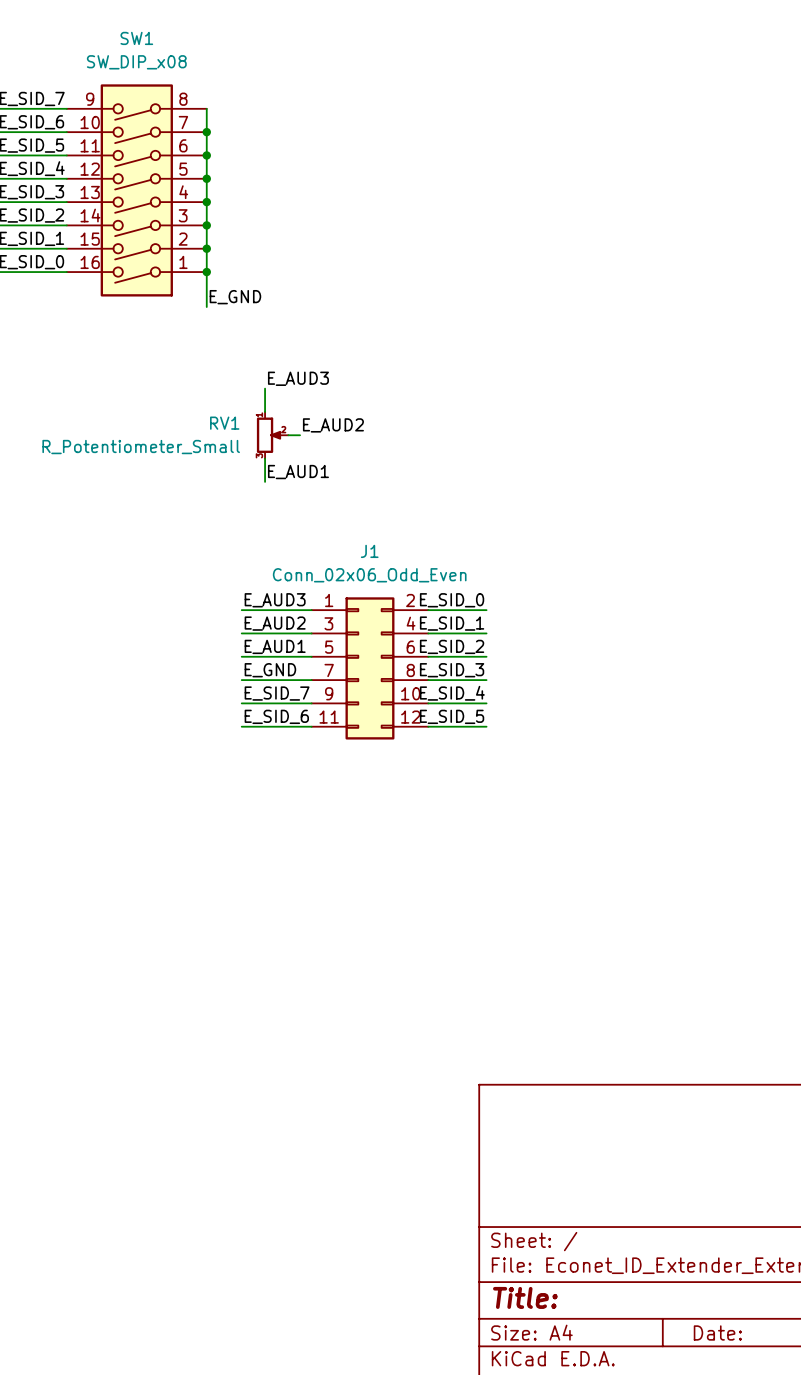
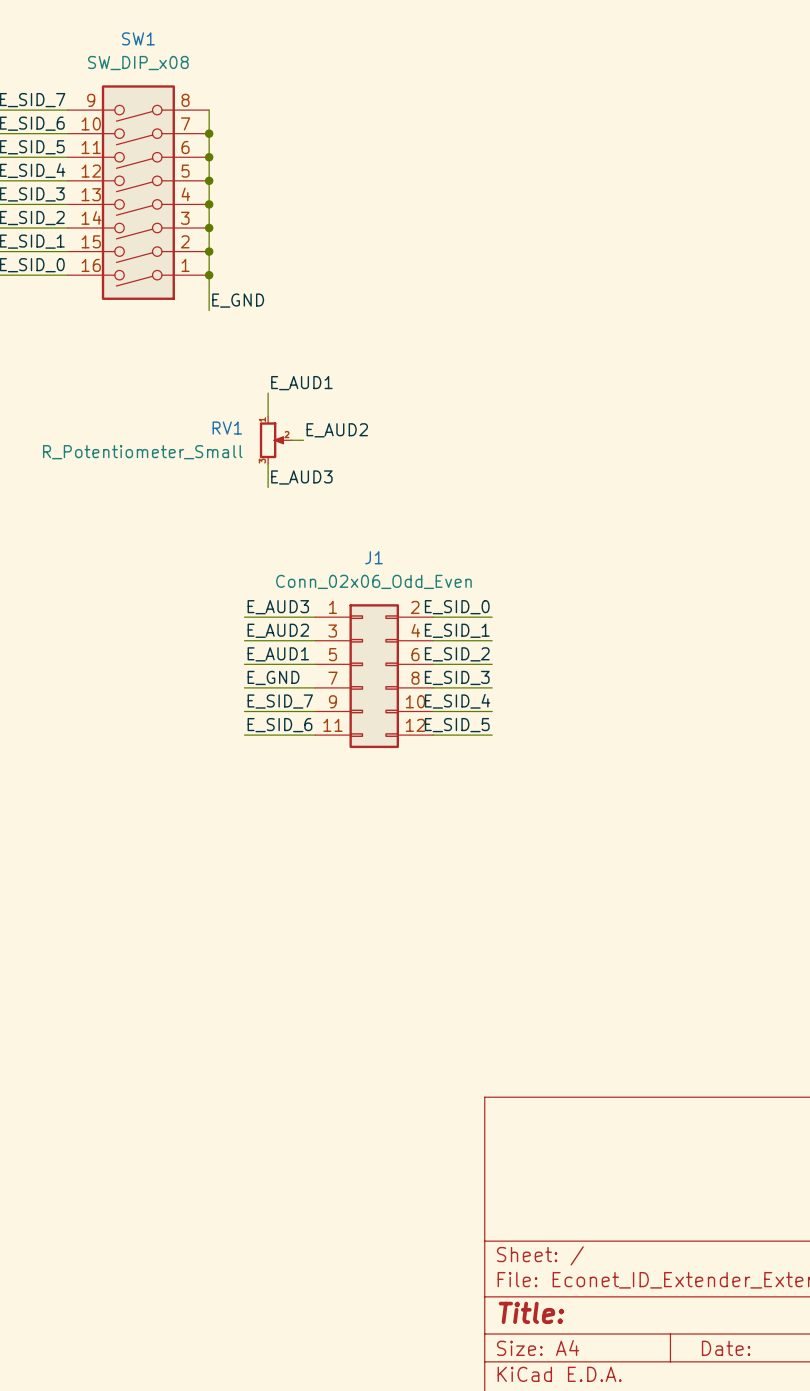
label: E_AUD3 (298, 378) -> E_AUD1 (301, 383)
label: E_AUD1 (298, 472) -> E_AUD3 (301, 477)

